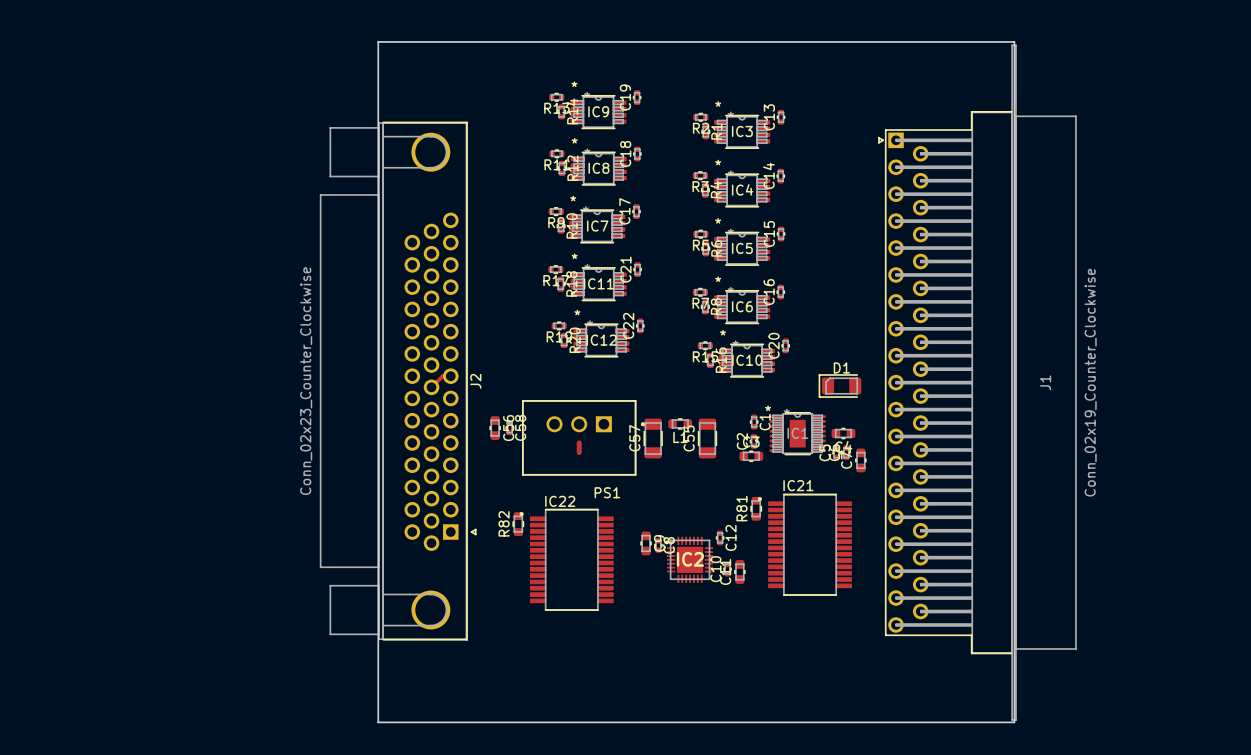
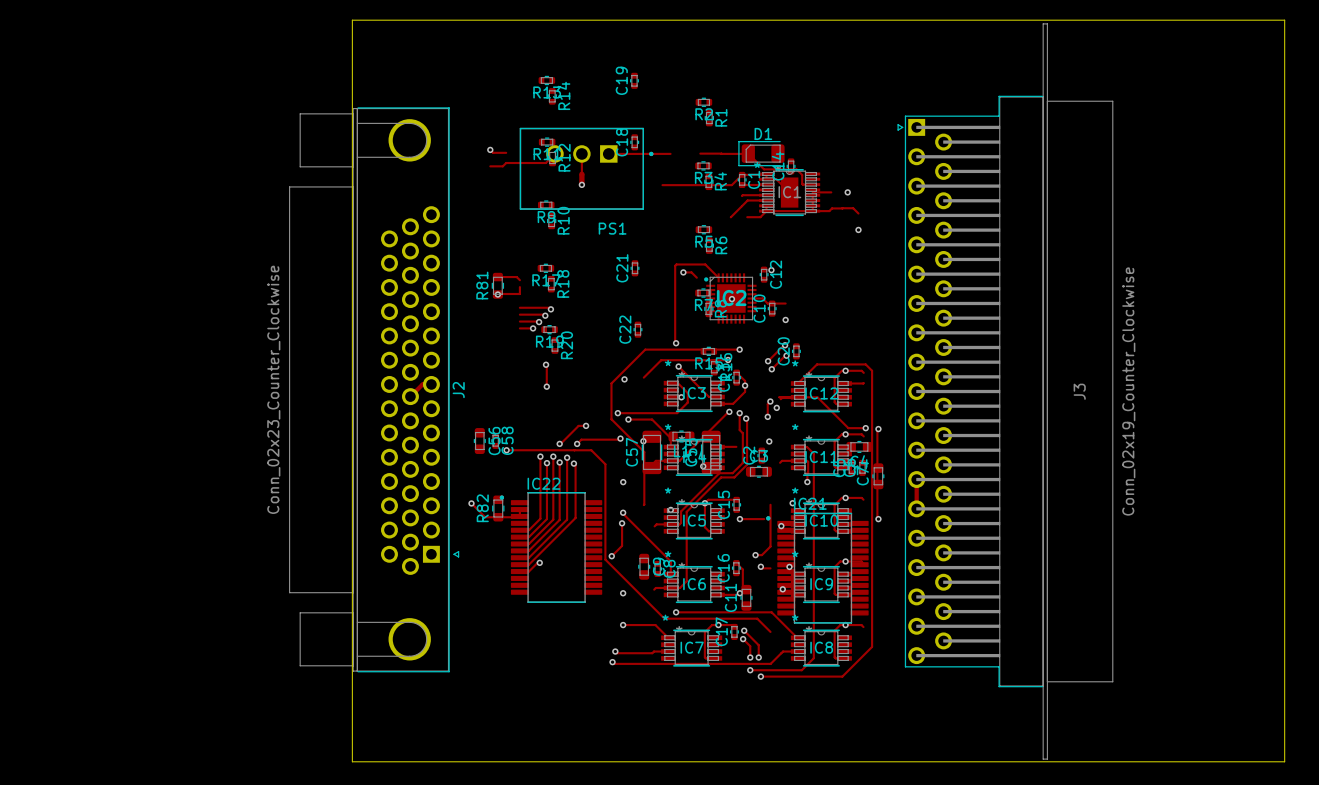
board edge: (1014, 41) (1014, 722) -> (1045, 20) (1284, 20) (1284, 761) (1045, 761)
IC9 position: (598, 112) -> (821, 584)
C13 position: (781, 117) -> (736, 377)
IC3 position: (742, 131) -> (694, 393)
track: none -> (490, 149) (493, 152) (506, 152)
via: none -> (490, 149)
track: none -> (554, 153) (545, 163) (506, 163) (502, 166) (490, 166)
track: none -> (581, 153) (581, 174)
track: none -> (608, 153) (670, 153)
track: none -> (700, 153) (748, 153) (764, 169) (796, 169) (802, 174) (802, 184) (812, 184)
IC8 position: (598, 168) -> (821, 648)
part: none -> (581, 179)
IC4 position: (742, 190) -> (694, 457)
track: none -> (766, 184) (742, 184)
via: none -> (581, 184)
track: none -> (662, 185) (731, 185) (742, 174) (766, 174) (766, 179) (776, 179) (789, 192)
track: none -> (831, 192) (815, 192) (812, 189) (812, 211)
via: none -> (847, 192)
track: none -> (766, 195) (741, 196)
track: none -> (766, 200) (747, 200) (730, 217)
C17 position: (636, 211) -> (734, 631)
track: none -> (766, 205) (766, 211) (760, 217) (747, 217)
track: none -> (766, 211) (829, 211) (832, 208) (853, 208) (858, 213)
IC7 position: (597, 226) -> (691, 648)
C15 position: (781, 234) -> (736, 504)
via: none -> (858, 229)
IC5 position: (742, 248) -> (694, 520)
via: none -> (771, 270)
track: none -> (683, 272) (691, 272) (696, 277)
via: none -> (683, 272)
track: none -> (497, 277) (516, 277) (519, 280)
track: none -> (718, 277) (705, 264) (675, 265) (676, 343)
IC11 position: (598, 284) -> (821, 457)
track: none -> (519, 287) (519, 293) (497, 294)
C16 position: (780, 292) -> (736, 568)
via: none -> (497, 294)
via: none -> (731, 299)
track: none -> (752, 298) (762, 298) (767, 303) (785, 303)
track: none -> (519, 307) (549, 307) (550, 309)
via: none -> (550, 309)
IC6 position: (742, 307) -> (694, 584)
track: none -> (519, 314) (545, 315)
via: none -> (545, 315)
via: none -> (785, 319)
track: none -> (519, 321) (539, 322)
via: none -> (539, 322)
track: none -> (519, 328) (533, 328)
via: none -> (533, 328)
via: none -> (676, 343)
IC12 position: (601, 340) -> (821, 393)
track: none -> (785, 345) (768, 361)
via: none -> (785, 345)
track: none -> (739, 349) (645, 349) (611, 383) (611, 419) (644, 452) (643, 505)
via: none -> (739, 349)
track: none -> (786, 355) (771, 369)
via: none -> (786, 355)
track: none -> (728, 360) (661, 360) (643, 377)
via: none -> (728, 360)
via: none -> (768, 361)
track: none -> (546, 364) (546, 386)
via: none -> (546, 364)
track: none -> (678, 366) (709, 396) (717, 396)
via: none -> (678, 366)
IC10 position: (747, 360) -> (821, 520)
via: none -> (771, 369)
via: none -> (845, 370)
track: none -> (736, 372) (745, 380) (745, 391) (733, 403) (717, 403)
track: none -> (863, 372) (861, 370) (841, 370) (834, 378) (834, 402) (836, 404) (844, 404)
via: none -> (624, 379)
track: none -> (863, 383) (844, 383)
track: none -> (670, 383) (677, 383) (687, 393) (687, 402) (677, 413) (617, 413)
track: none -> (797, 383) (817, 364) (865, 364) (872, 370) (872, 646) (842, 676) (760, 676)
via: none -> (745, 385)
via: none -> (546, 386)
J1 name: J1 (1045, 382) -> J3 (1079, 391)
D1 position: (840, 386) -> (761, 153)
via: none -> (681, 397)
track: none -> (779, 397) (817, 397) (848, 428) (865, 428)
track: none -> (782, 397) (780, 399)
track: none -> (770, 401) (767, 404) (767, 416)
via: none -> (770, 401)
via: none -> (776, 407)
track: none -> (729, 411) (679, 460) (655, 460) (654, 462)
via: none -> (729, 411)
via: none -> (617, 413)
track: none -> (739, 413) (739, 430) (742, 433) (742, 462) (732, 473) (719, 473) (681, 511) (679, 524) (656, 524) (654, 526)
via: none -> (739, 413)
via: none -> (767, 416)
track: none -> (746, 418) (747, 464) (734, 477) (721, 477) (686, 511) (686, 581) (679, 587) (655, 587) (654, 589)
via: none -> (746, 418)
track: none -> (628, 419) (652, 419) (670, 438) (670, 447)
via: none -> (628, 419)
track: none -> (586, 425) (578, 425) (559, 443)
via: none -> (586, 425)
via: none -> (865, 428)
track: none -> (878, 429) (878, 519)
via: none -> (878, 429)
via: none -> (845, 434)
C1 position: (754, 422) -> (742, 179)
track: none -> (863, 436) (861, 434) (841, 434) (834, 441) (834, 466) (844, 467)
track: none -> (620, 438) (581, 439) (577, 443)
via: none -> (620, 438)
via: none -> (643, 441)
via: none -> (769, 441)
via: none -> (559, 443)
via: none -> (577, 443)
track: none -> (736, 446) (717, 447)
track: none -> (797, 447) (807, 447) (813, 453) (813, 658) (801, 670) (750, 670)
IC1 position: (797, 433) -> (789, 192)
track: none -> (506, 450) (591, 450) (605, 464) (605, 559) (664, 618) (757, 618) (770, 631)
via: none -> (506, 450)
PS1 position: (583, 437) -> (586, 168)
track: none -> (540, 456) (540, 518) (528, 530) (519, 530)
via: none -> (540, 456)
track: none -> (553, 456) (553, 519) (528, 544) (519, 544)
via: none -> (553, 456)
track: none -> (567, 457) (567, 519) (528, 557) (519, 557)
via: none -> (567, 457)
track: none -> (559, 462) (559, 519) (528, 550) (519, 550)
via: none -> (559, 462)
part: (579, 447) -> none
track: none -> (546, 463) (546, 519) (528, 537) (519, 537)
via: none -> (546, 463)
track: none -> (573, 463) (575, 465) (575, 518) (528, 564) (519, 564)
via: none -> (573, 463)
track: none -> (780, 462) (782, 460) (807, 460) (807, 482)
via: none -> (703, 466)
track: none -> (916, 479) (916, 508)
via: none -> (623, 482)
via: none -> (807, 482)
track: none -> (734, 497) (736, 499) (708, 499) (704, 503) (704, 527) (708, 531) (717, 531)
via: none -> (845, 497)
track: none -> (863, 499) (861, 497) (841, 497) (834, 505) (834, 529) (844, 531)
track: none -> (471, 503) (485, 517) (519, 517) (519, 509)
via: none -> (471, 503)
via: none -> (704, 503)
via: none -> (792, 503)
track: none -> (770, 504) (770, 546) (761, 555) (755, 555)
via: none -> (670, 509)
track: none -> (623, 512) (670, 561) (670, 574)
via: none -> (623, 512)
track: none -> (739, 519) (764, 519)
via: none -> (739, 519)
via: none -> (878, 519)
track: none -> (622, 523) (622, 545) (611, 556)
via: none -> (622, 523)
via: none -> (781, 526)
R81 position: (756, 508) -> (497, 285)
R82 position: (518, 524) -> (498, 508)
via: none -> (755, 555)
via: none -> (611, 556)
C12 position: (720, 537) -> (764, 274)
via: none -> (845, 561)
track: none -> (539, 562) (528, 571) (519, 571)
via: none -> (539, 562)
track: none -> (736, 563) (742, 569) (742, 590) (738, 594) (717, 594)
track: none -> (863, 563) (861, 561) (840, 561) (834, 567) (834, 593) (844, 594)
track: none -> (760, 566) (770, 568)
via: none -> (760, 566)
via: none -> (789, 566)
IC22 position: (566, 559) -> (551, 547)
IC2 position: (689, 559) -> (730, 298)
via: none -> (782, 589)
via: none -> (623, 593)
via: none -> (739, 593)
C10 position: (727, 569) -> (772, 308)
track: none -> (676, 612) (771, 612) (797, 637)
via: none -> (676, 612)
track: none -> (623, 625) (655, 625) (668, 637)
via: none -> (623, 625)
via: none -> (718, 625)
via: none -> (845, 625)
track: none -> (734, 626) (732, 625) (712, 625) (704, 632) (704, 657) (715, 658)
track: none -> (863, 627) (861, 625) (840, 625) (834, 630) (834, 657) (844, 658)
track: none -> (744, 630) (758, 645) (758, 657)
via: none -> (744, 630)
track: none -> (743, 639) (750, 646) (750, 657)
via: none -> (743, 639)
track: none -> (615, 651) (617, 653) (668, 651)
via: none -> (615, 651)
track: none -> (797, 651) (783, 651) (770, 663) (614, 663) (612, 662)
via: none -> (750, 657)
via: none -> (758, 657)
via: none -> (612, 662)
via: none -> (750, 670)
via: none -> (760, 676)

